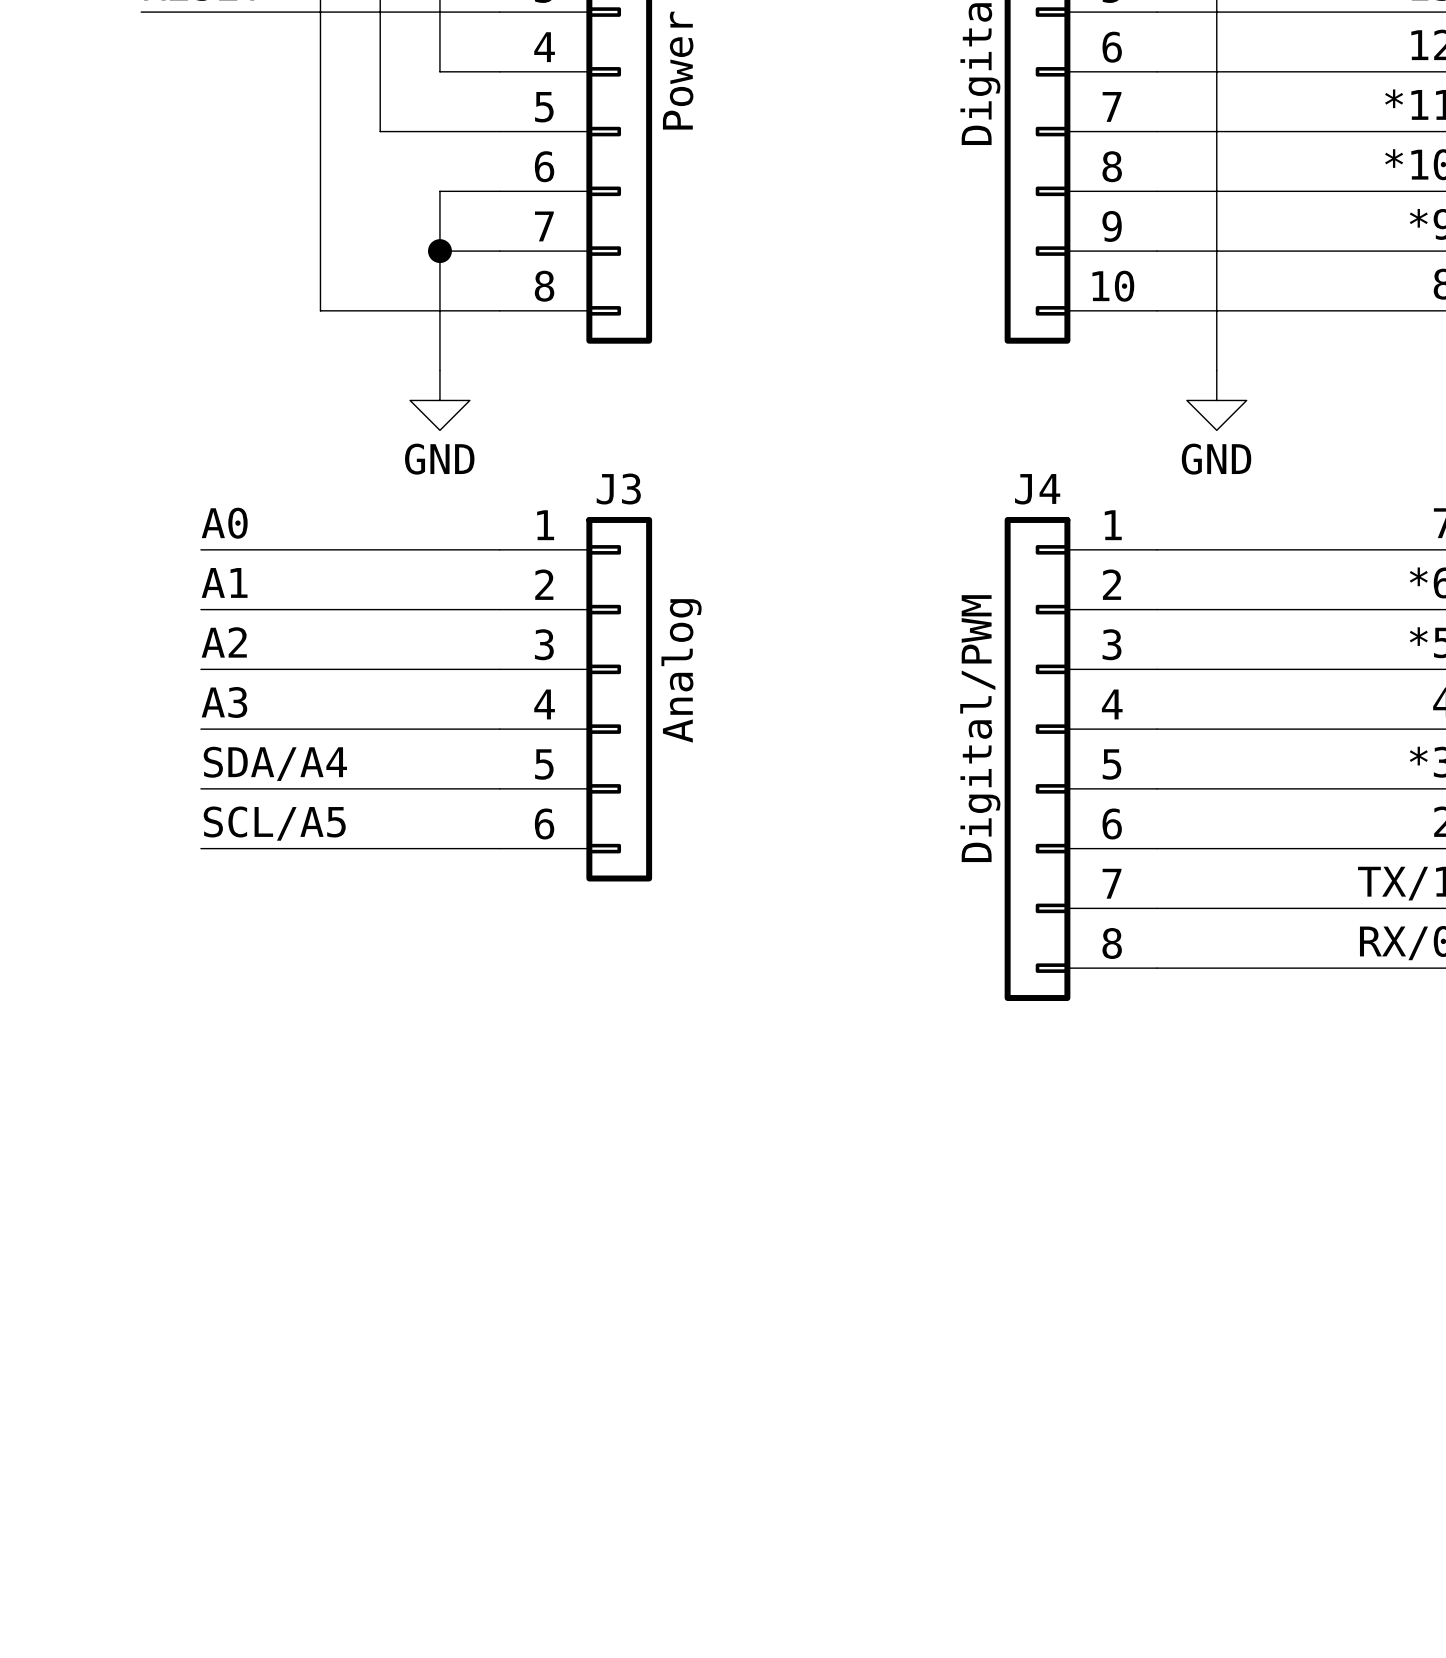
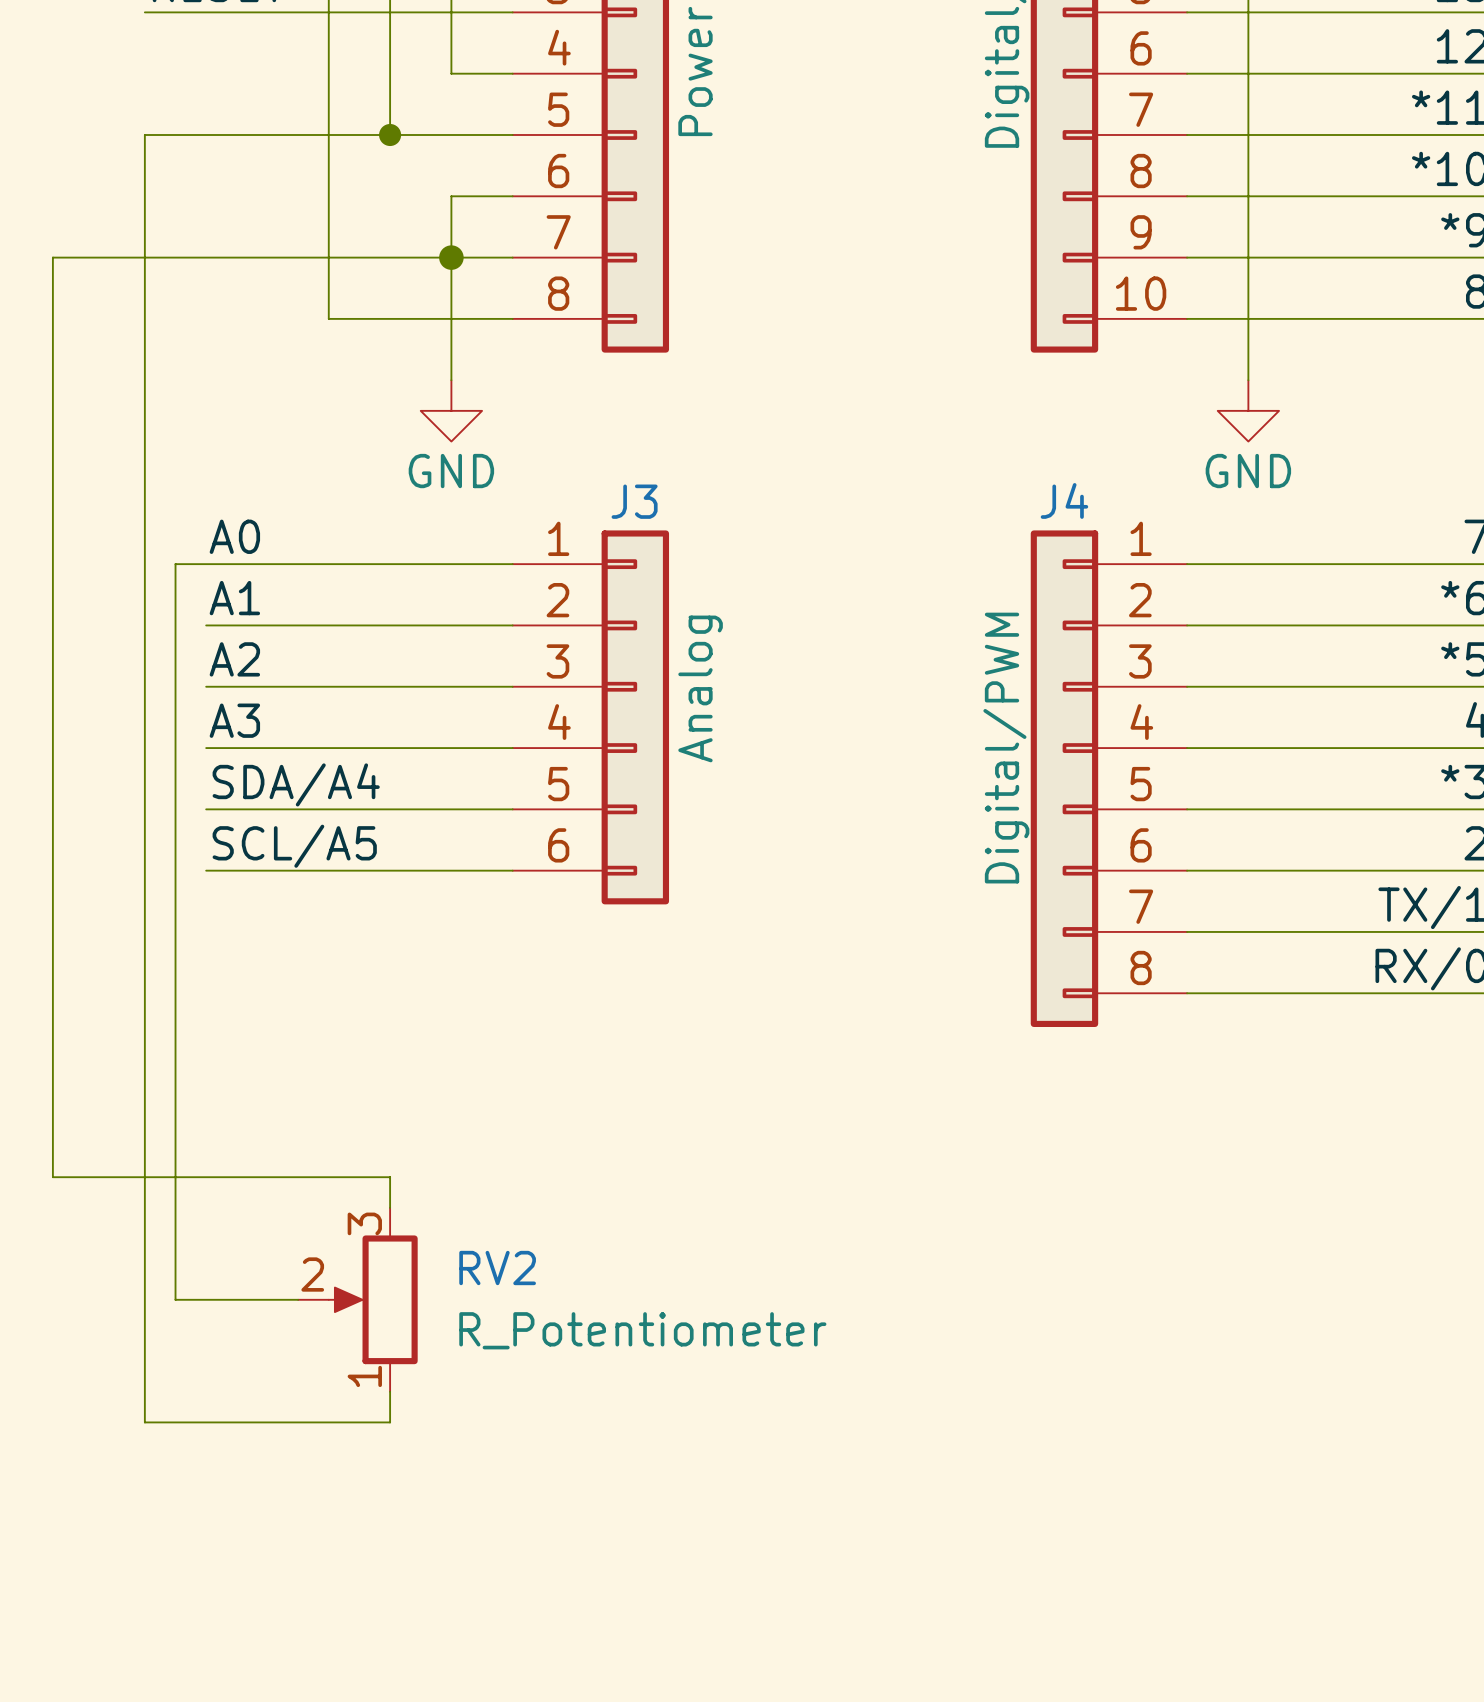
wire: none -> (390, 134) (144, 134) (144, 1422) (390, 1422) (390, 1391)
junction: none -> (390, 134)
wire: none -> (451, 257) (52, 257) (52, 1177) (390, 1177) (390, 1207)
wire: none -> (206, 564) (175, 564) (175, 1299) (298, 1299)
RV2: none -> R_Potentiometer (357, 1299)

